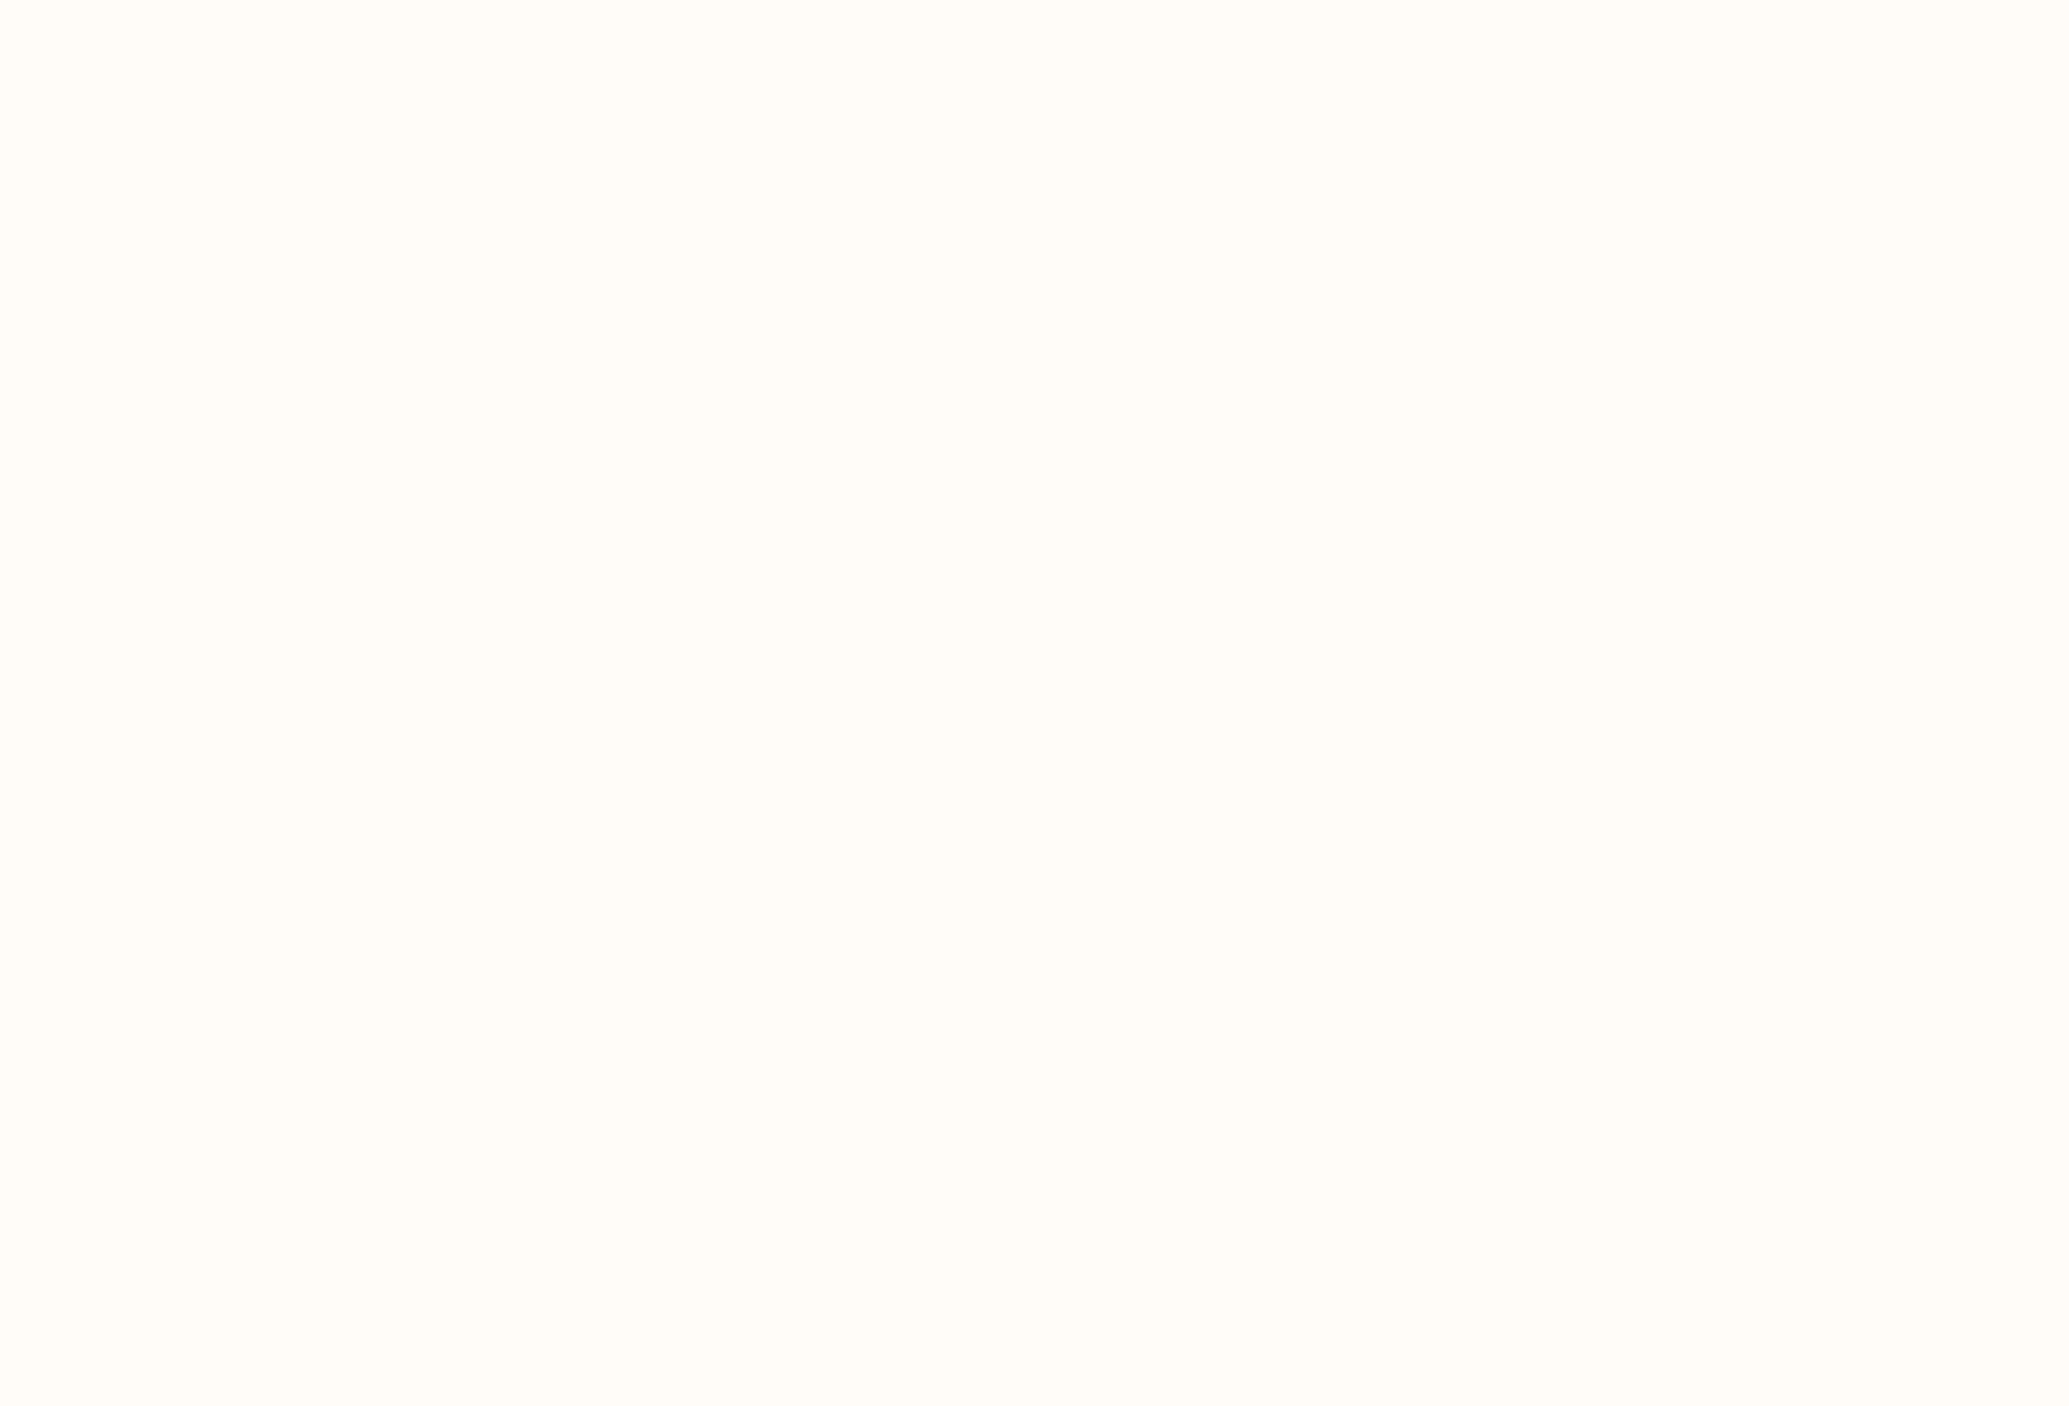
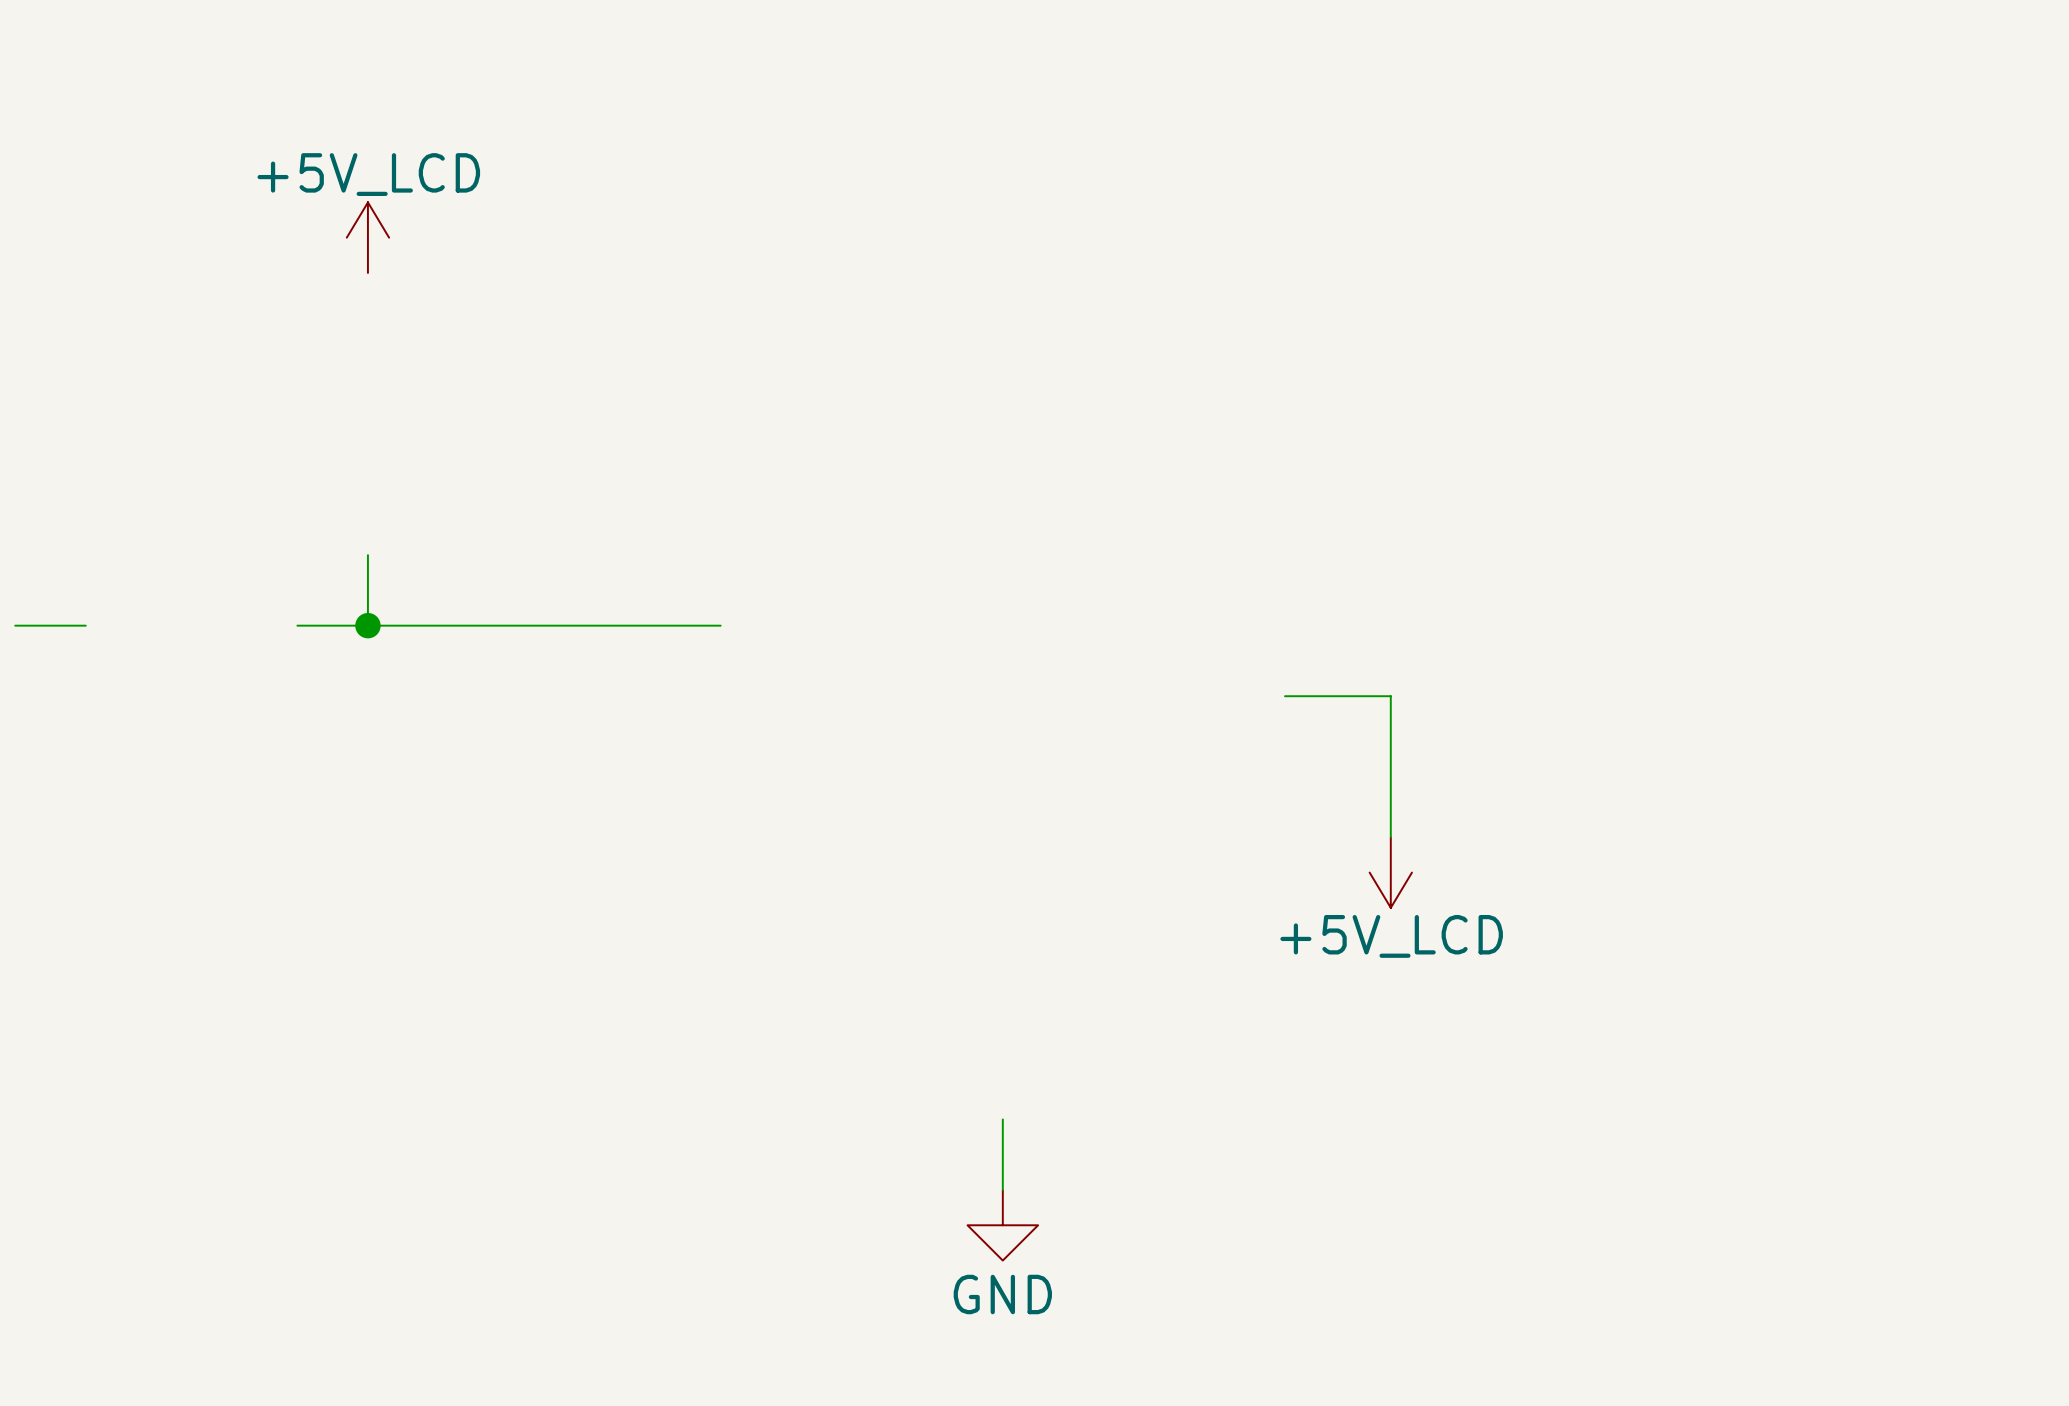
power symbol: none -> +5V_LCD (367, 237)
wire: none -> (367, 555) (367, 625)
wire: none -> (15, 625) (85, 625)
wire: none -> (297, 625) (720, 625)
junction: none -> (367, 625)
wire: none -> (1284, 696) (1390, 696) (1390, 837)
power symbol: none -> +5V_LCD (1390, 872)
wire: none -> (1002, 1119) (1002, 1190)
power symbol: none -> GND (1002, 1225)

